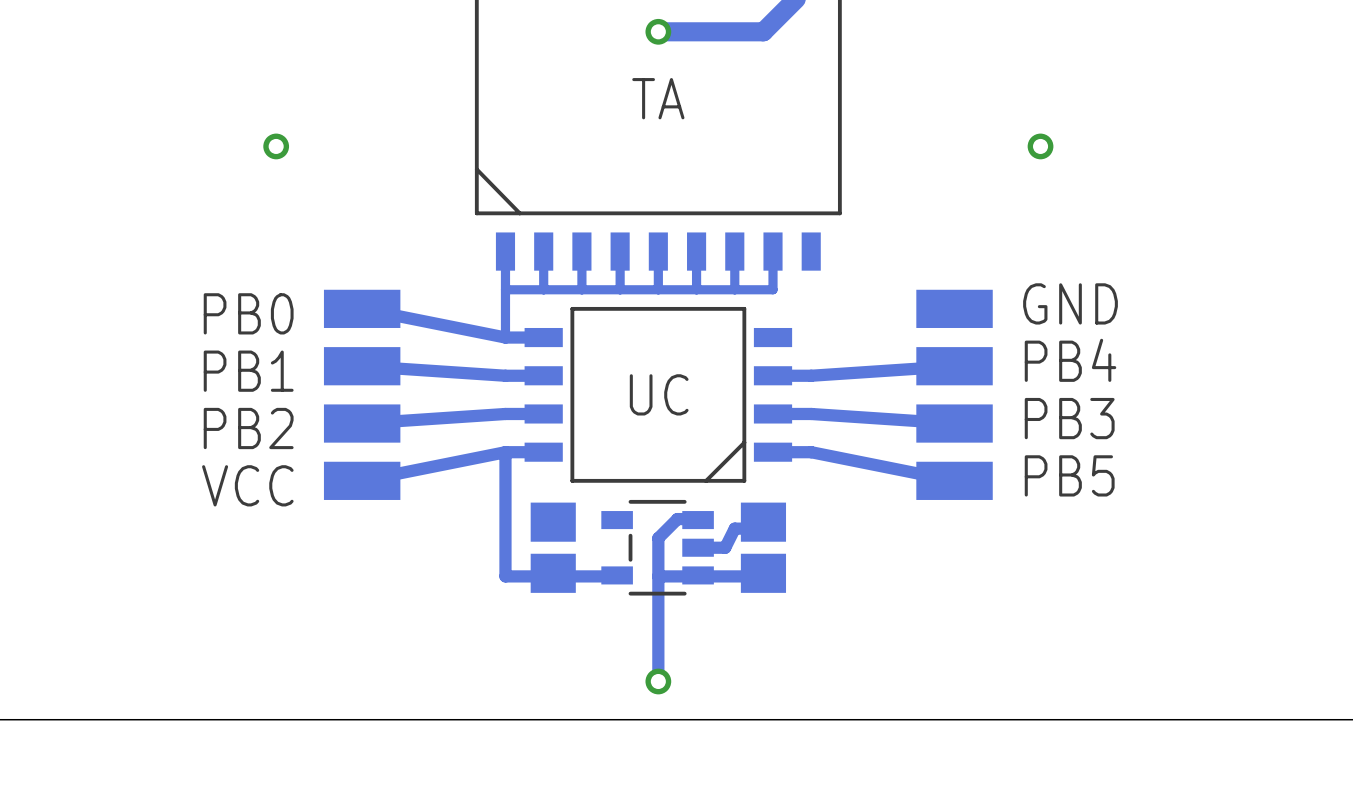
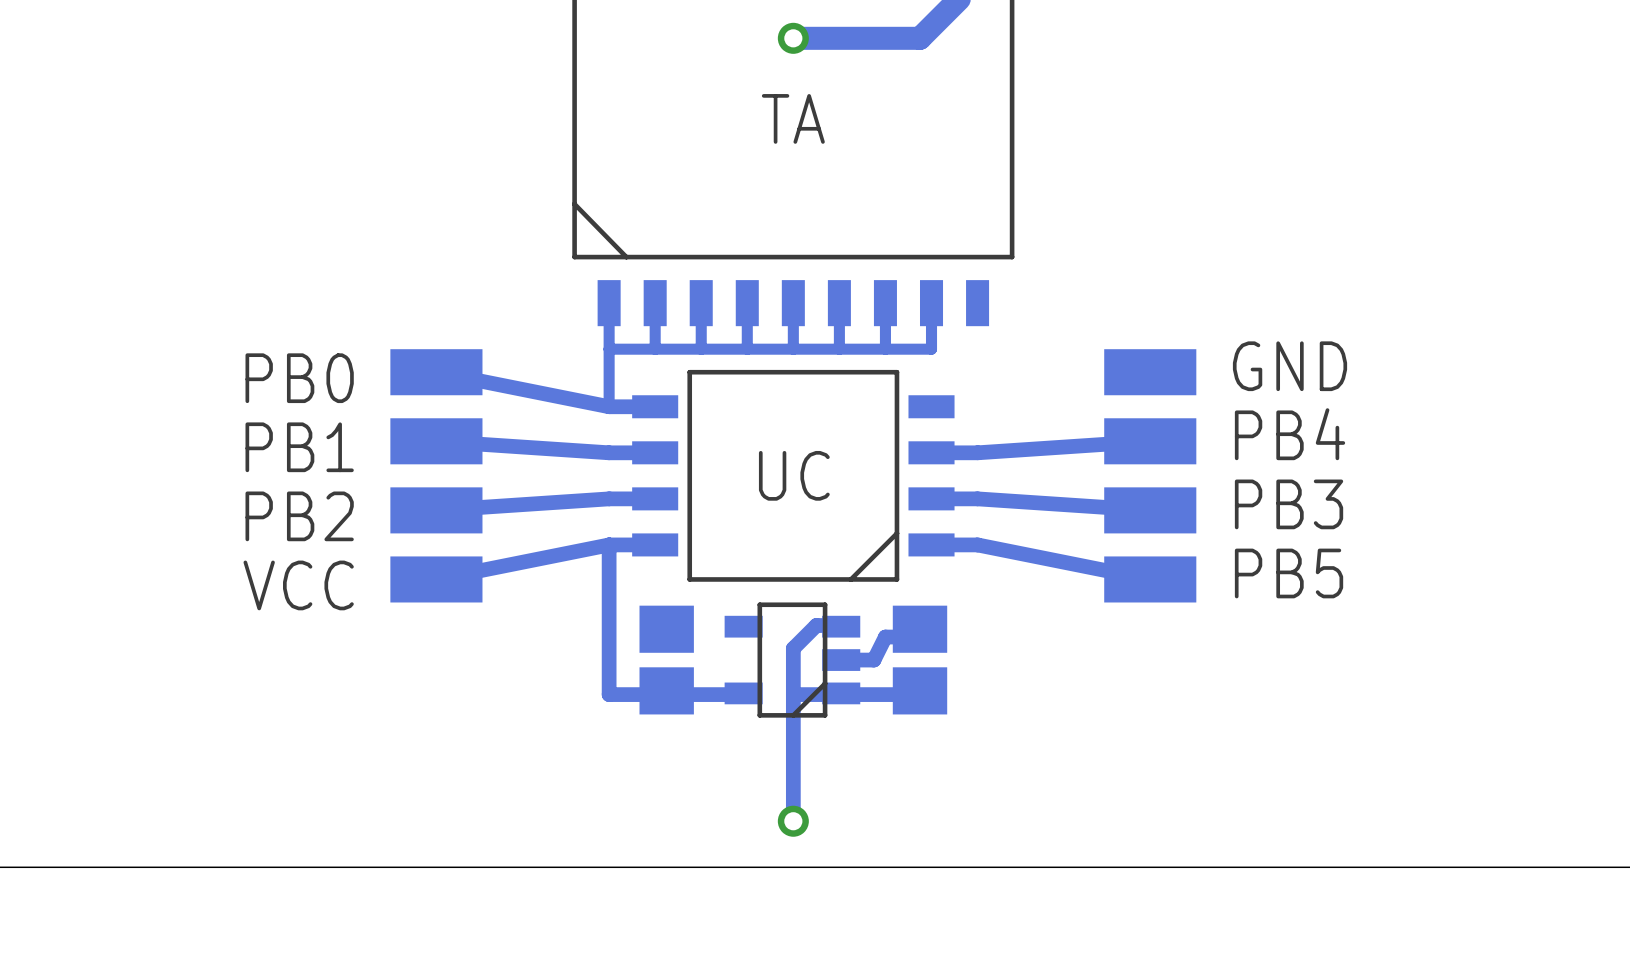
via: (276, 146) -> none
via: (1040, 146) -> none
part footprint: [601, 499, 714, 596] -> [724, 602, 861, 718]

